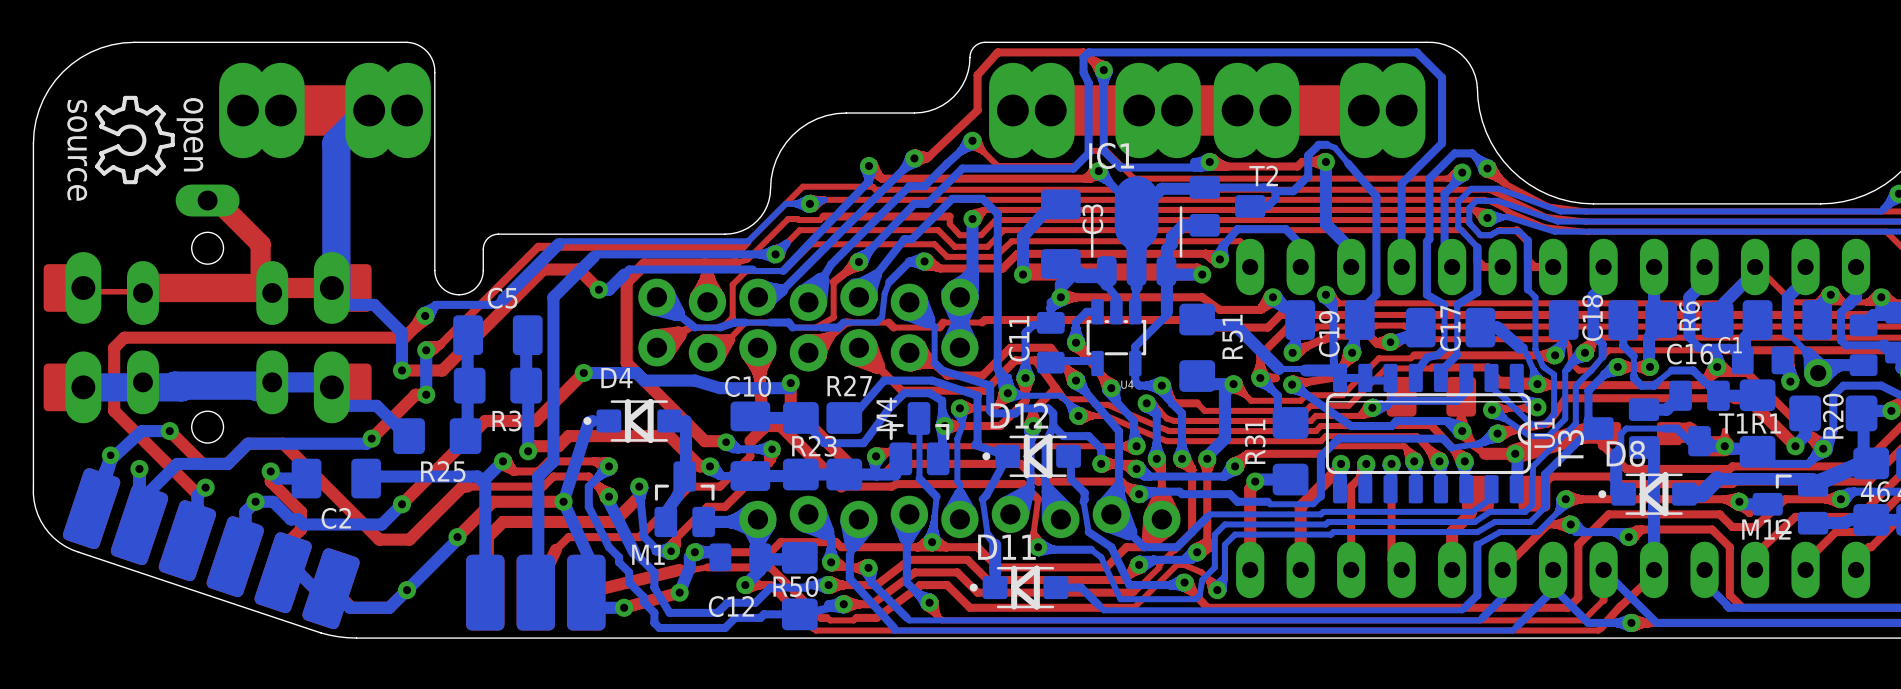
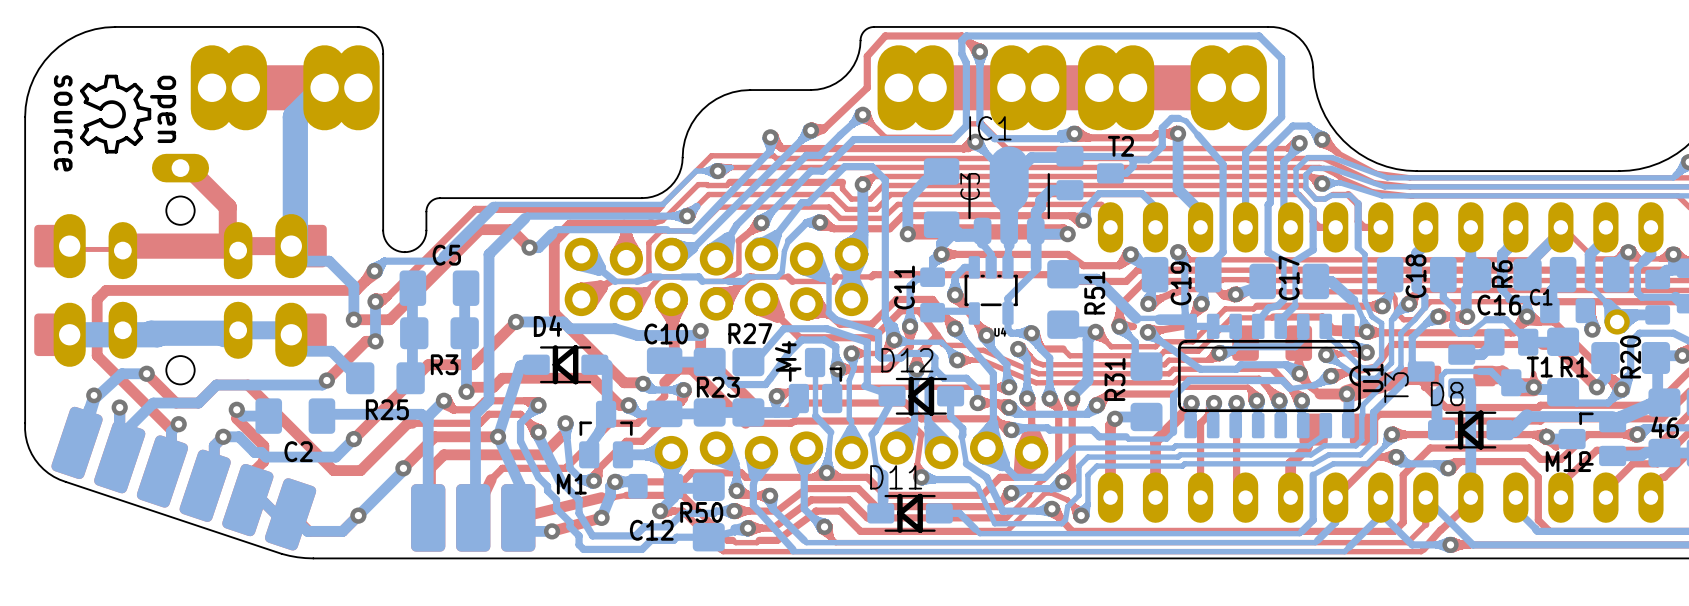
D4 footprint: [583, 399, 683, 443] -> [522, 345, 609, 385]
D12 footprint: [982, 434, 1081, 479] -> [878, 376, 965, 416]
D8 footprint: [1598, 472, 1697, 517] -> [1428, 410, 1514, 450]
D11 footprint: [969, 565, 1069, 610] -> [867, 493, 953, 533]

